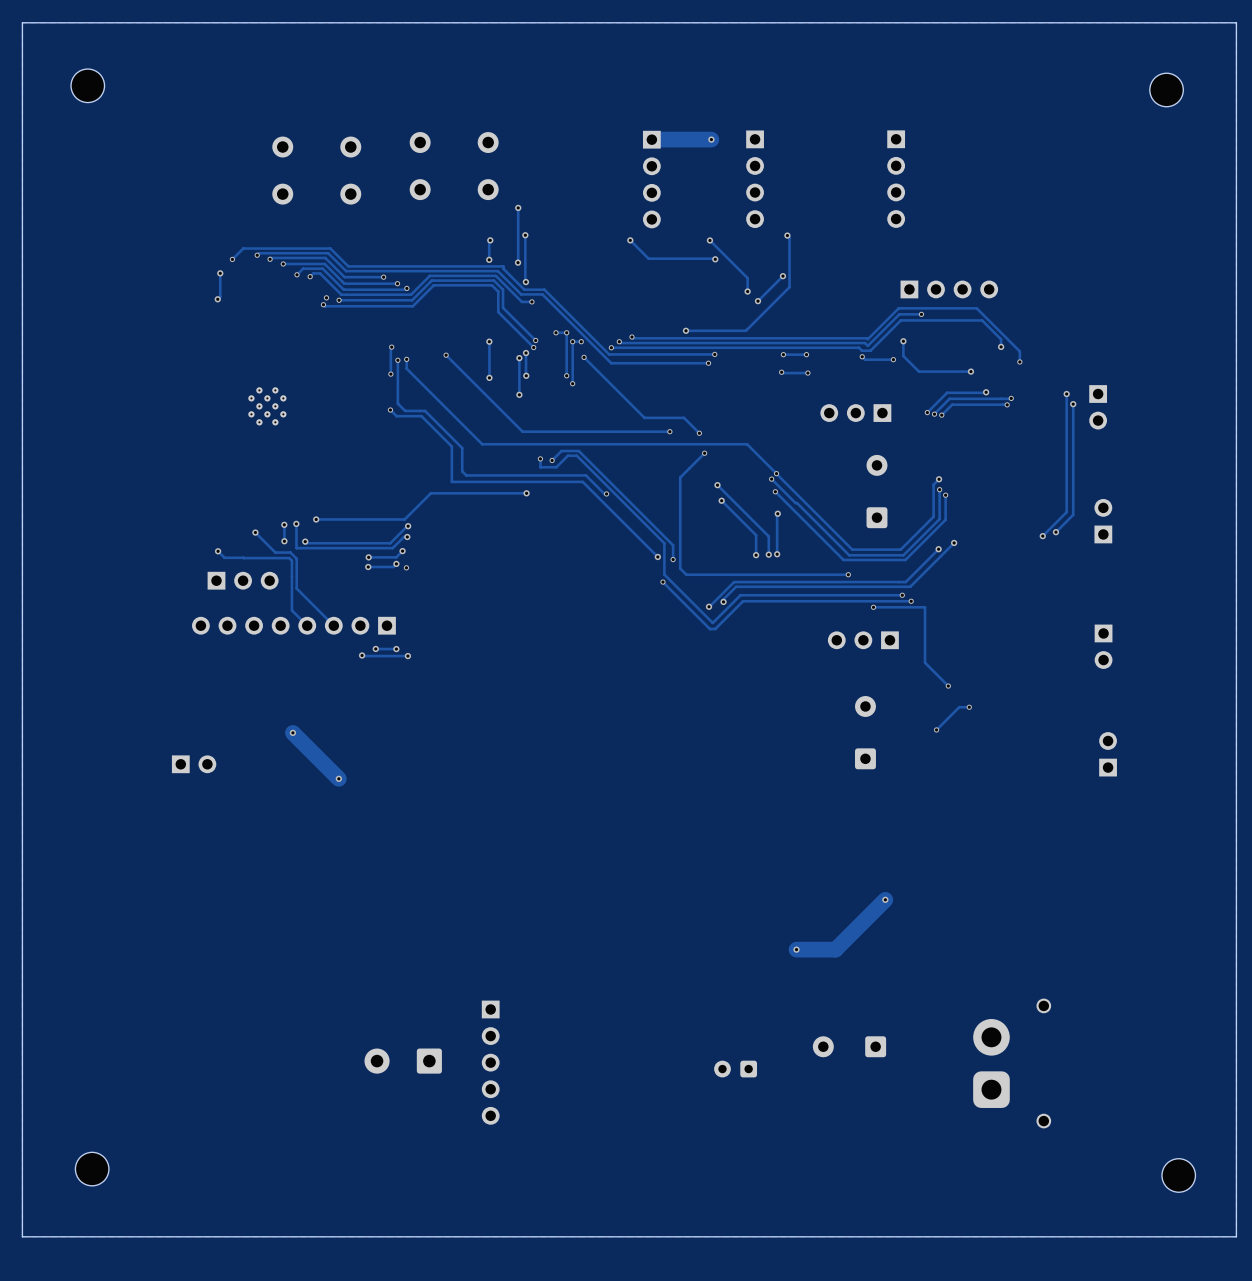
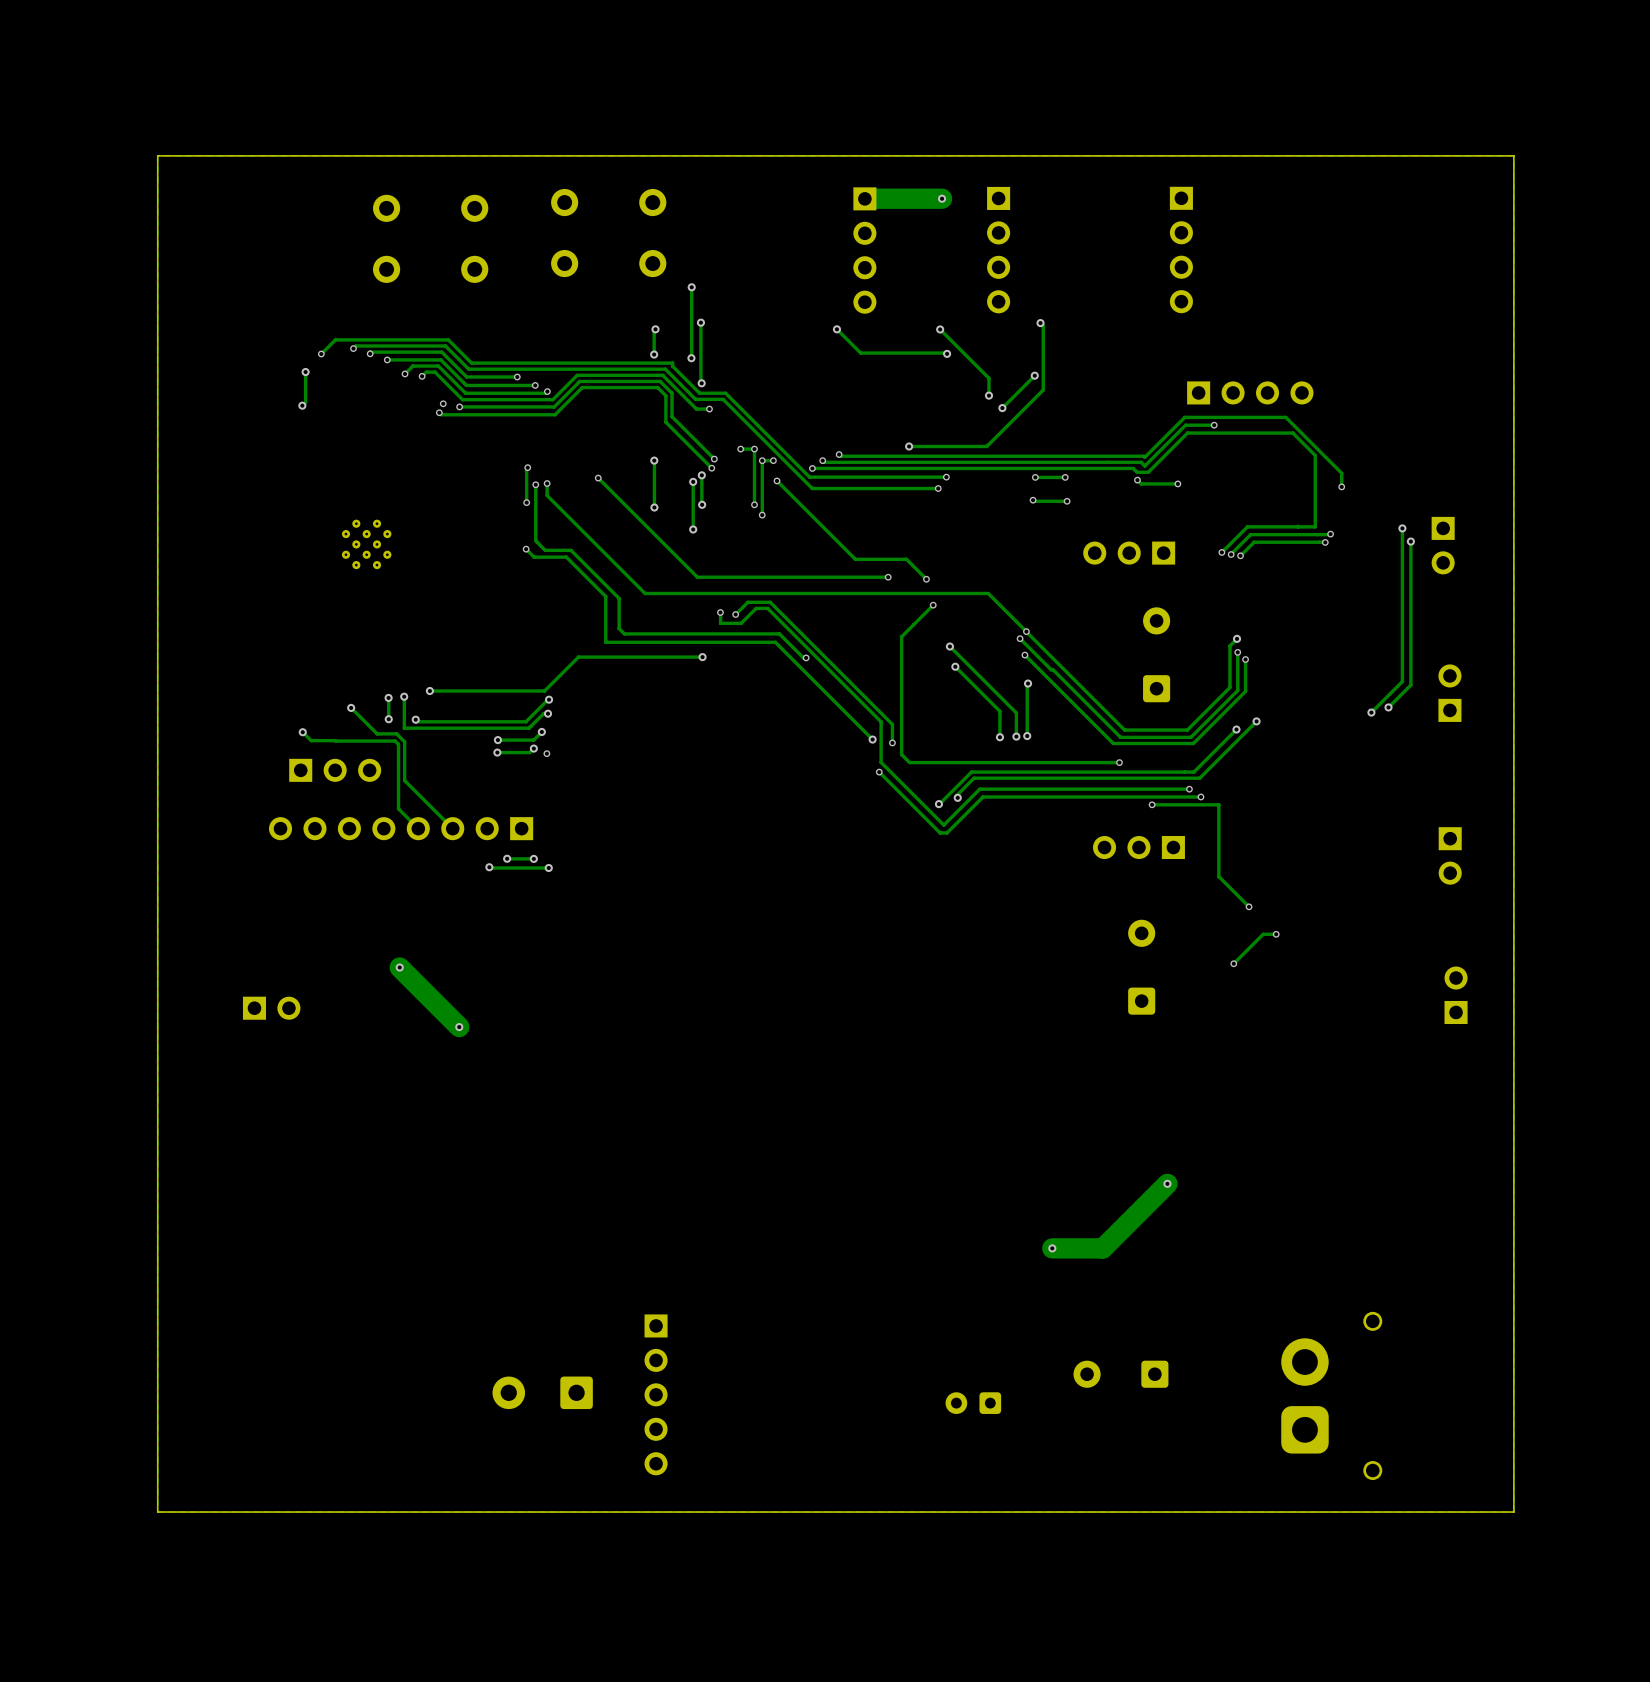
board edge: (1236, 22) (22, 22) (22, 1236) (1236, 1236) (1236, 22) -> (1513, 155) (1513, 1512) (157, 1512) (157, 155) (1513, 155)
part: (87, 85) -> none
part: (1166, 89) -> none
track: (999, 337) (1001, 346) -> (1315, 455) (1315, 526) (1297, 526)
track: (903, 341) (903, 356) (918, 371) (970, 371) -> none
via: (903, 341) -> none
via: (1001, 346) -> none
via: (970, 371) -> none
via: (986, 392) -> none
part: (92, 1169) -> none
part: (1178, 1175) -> none

